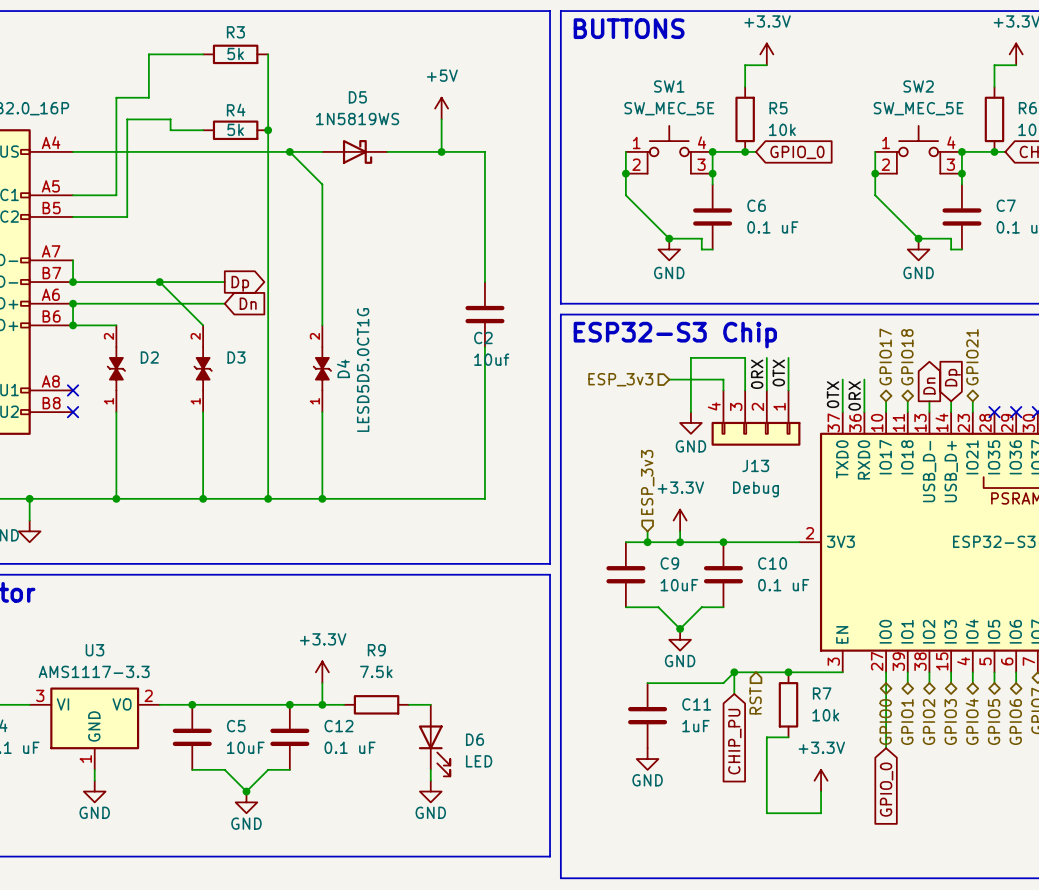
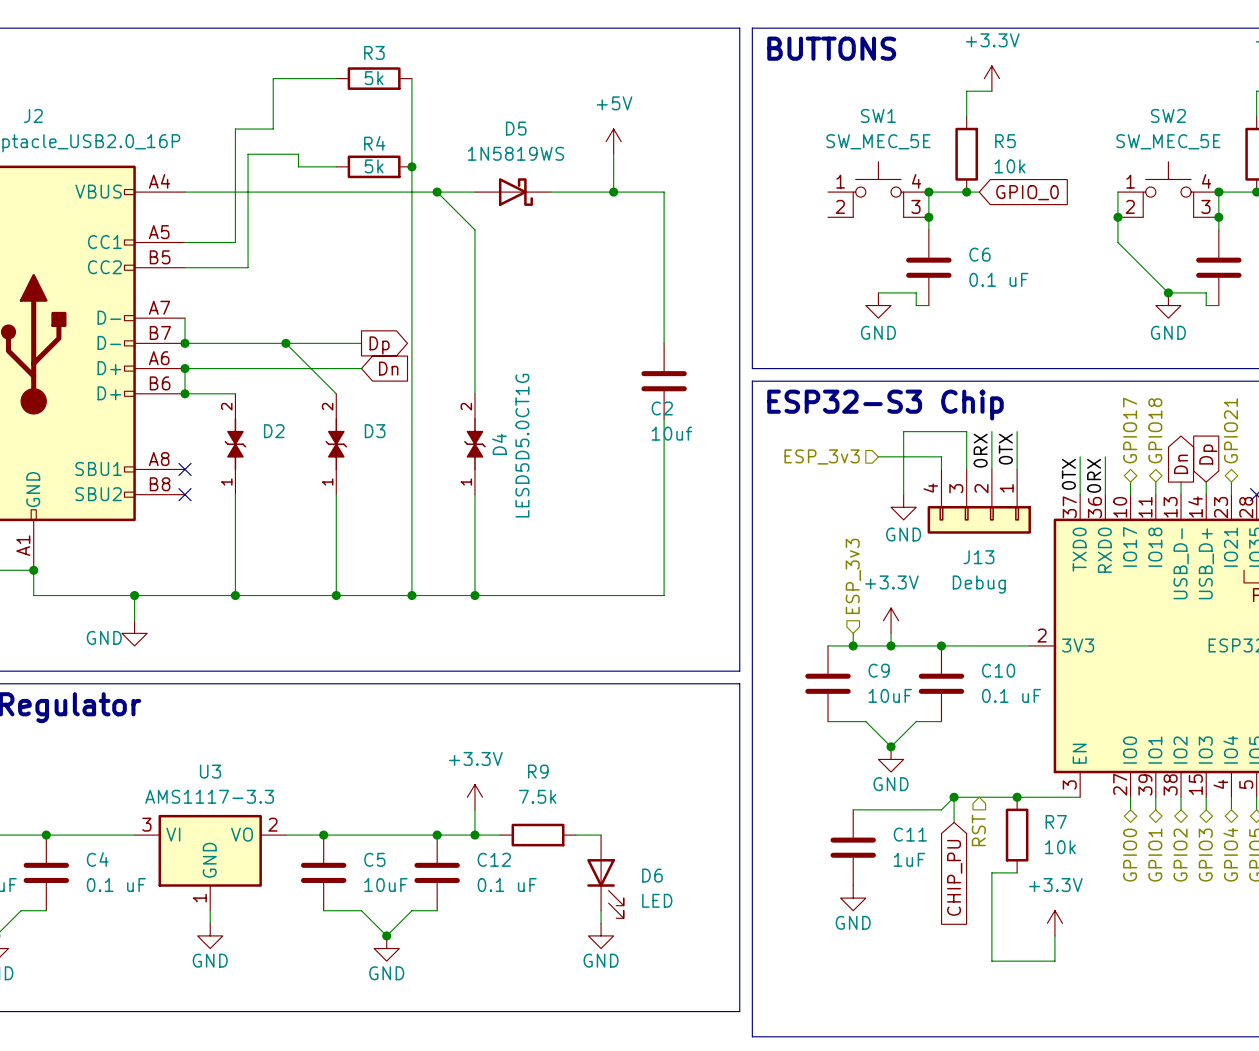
wire: (625, 151) (625, 195) (669, 238) -> none
junction: (625, 173) -> none
junction: (669, 238) -> none
wire: (886, 683) (886, 748) -> none
global label: GPIO_0 (886, 789) -> none

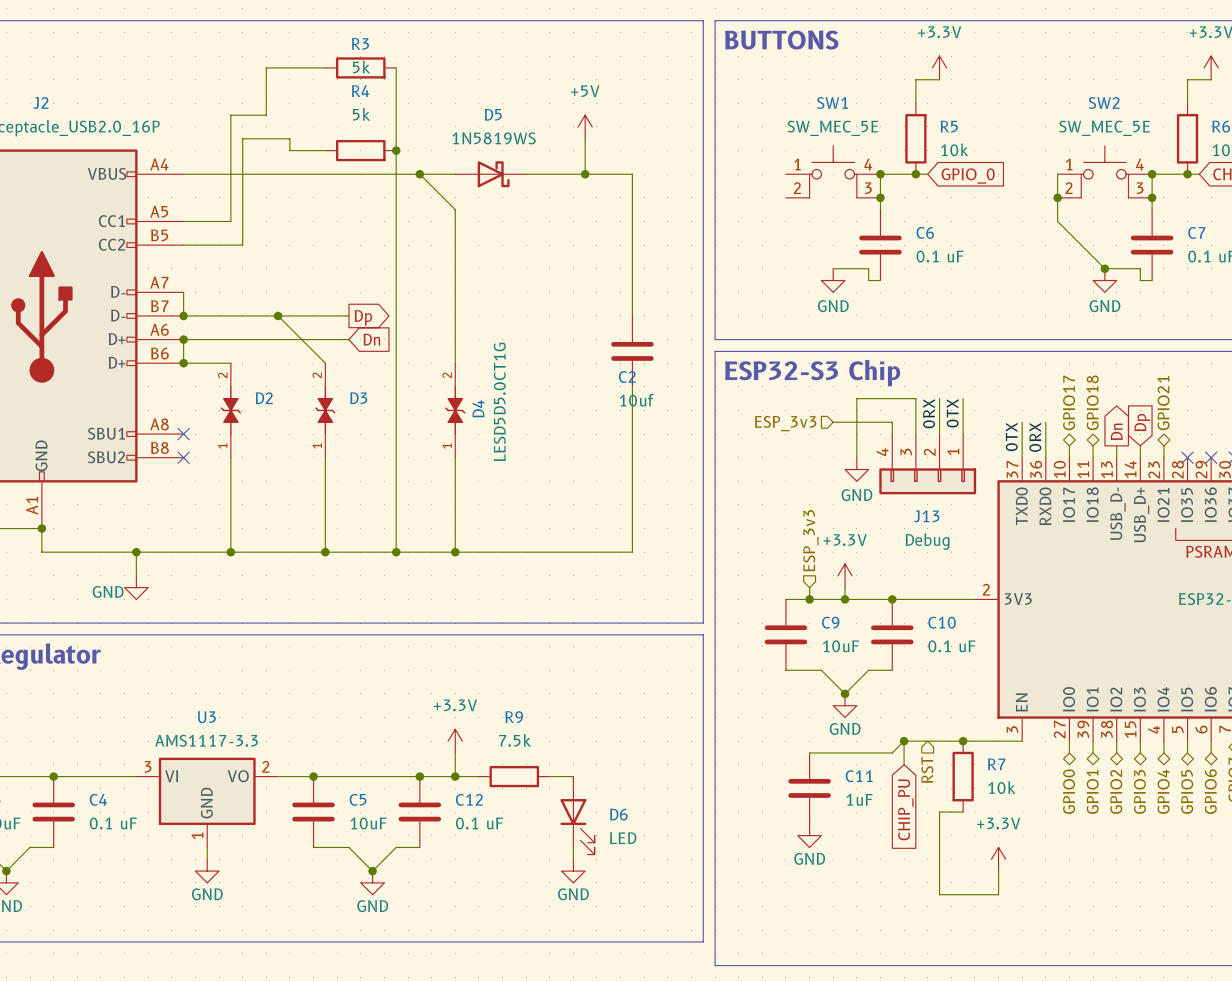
R4 name position: R4 (374, 143) -> R4 (360, 91)
R4 value position: 5k (374, 166) -> 5k (361, 114)

